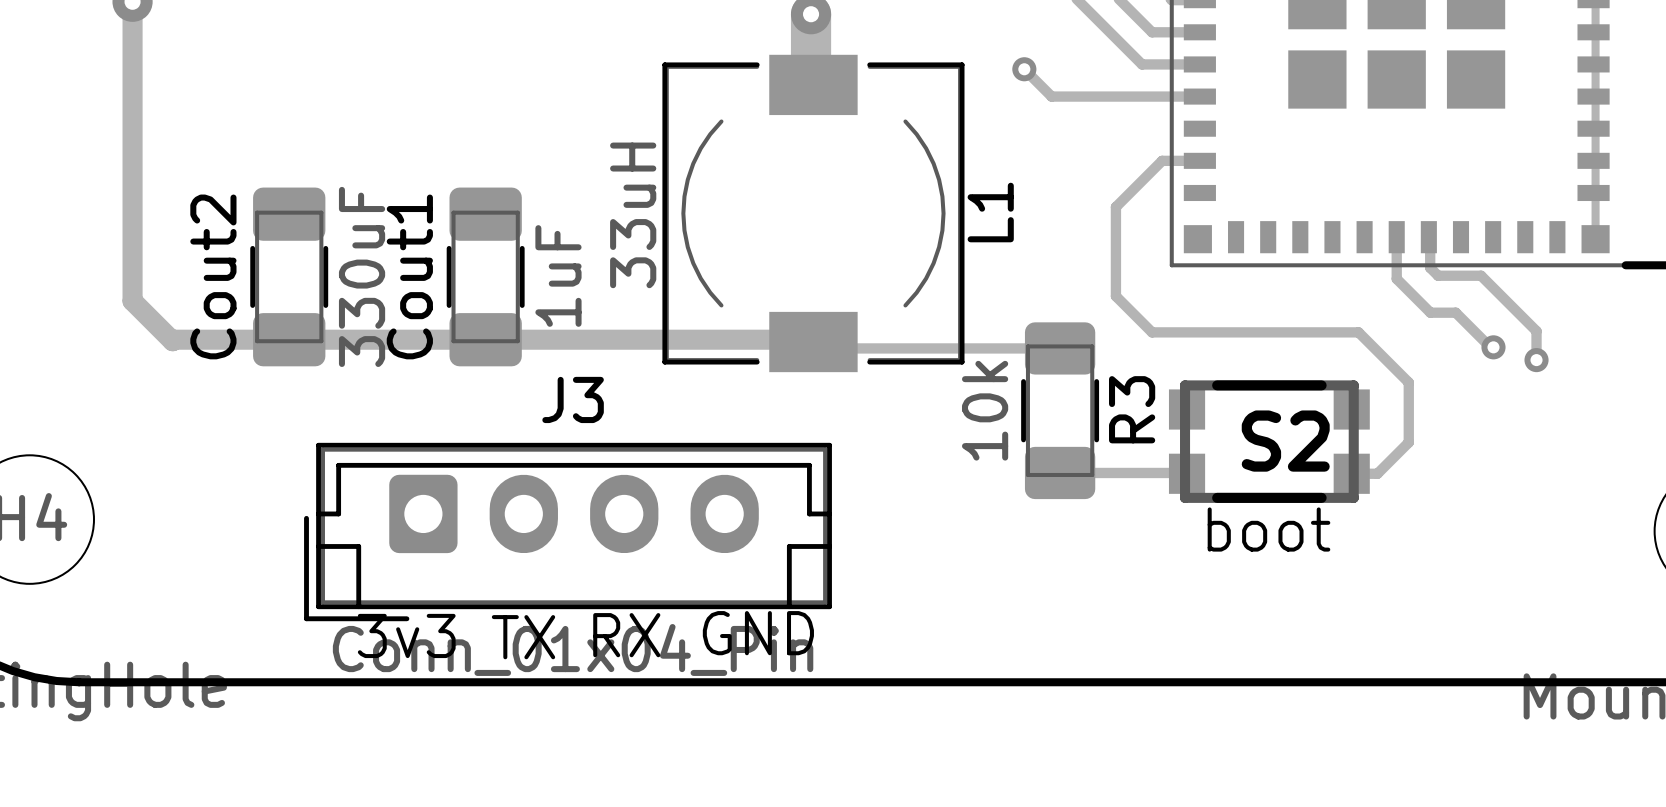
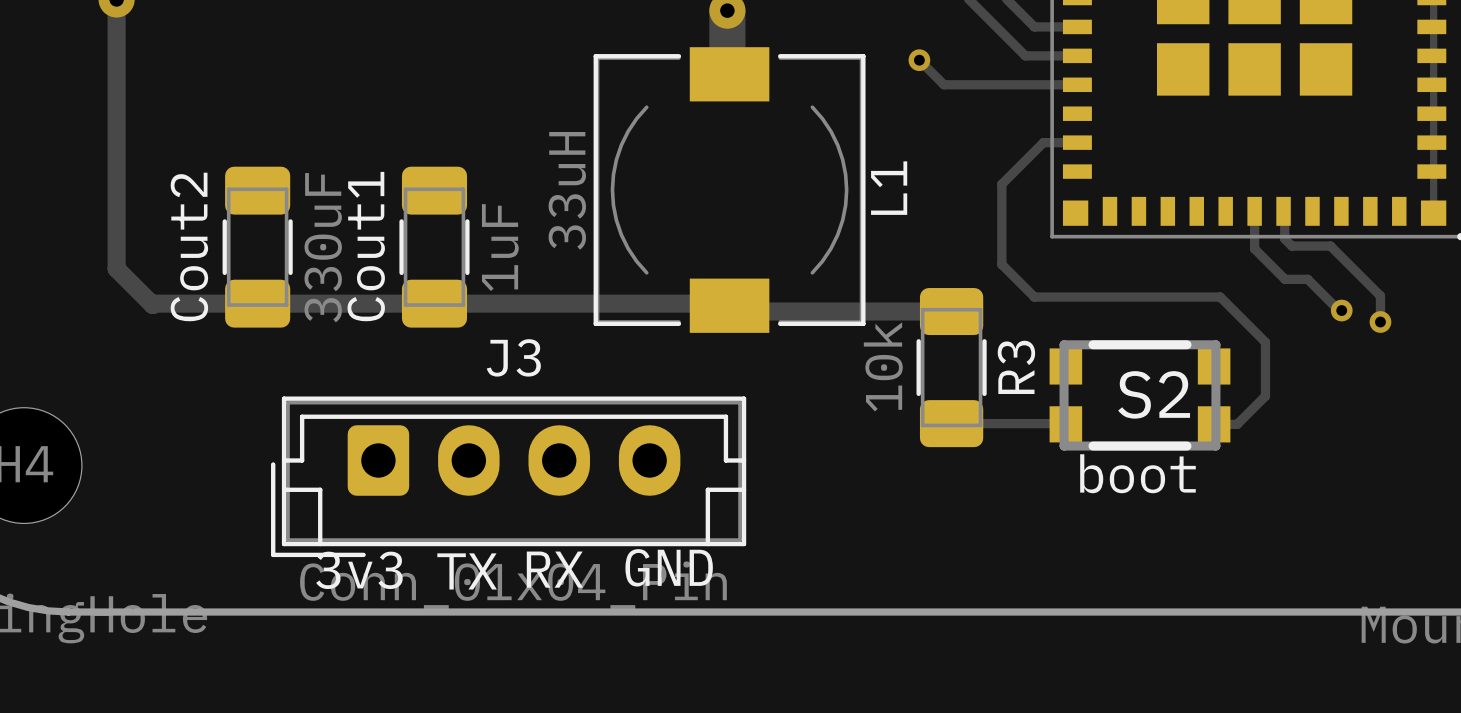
track width: thin (819, 348) (1060, 348) -> thick (735, 311) (951, 311)

